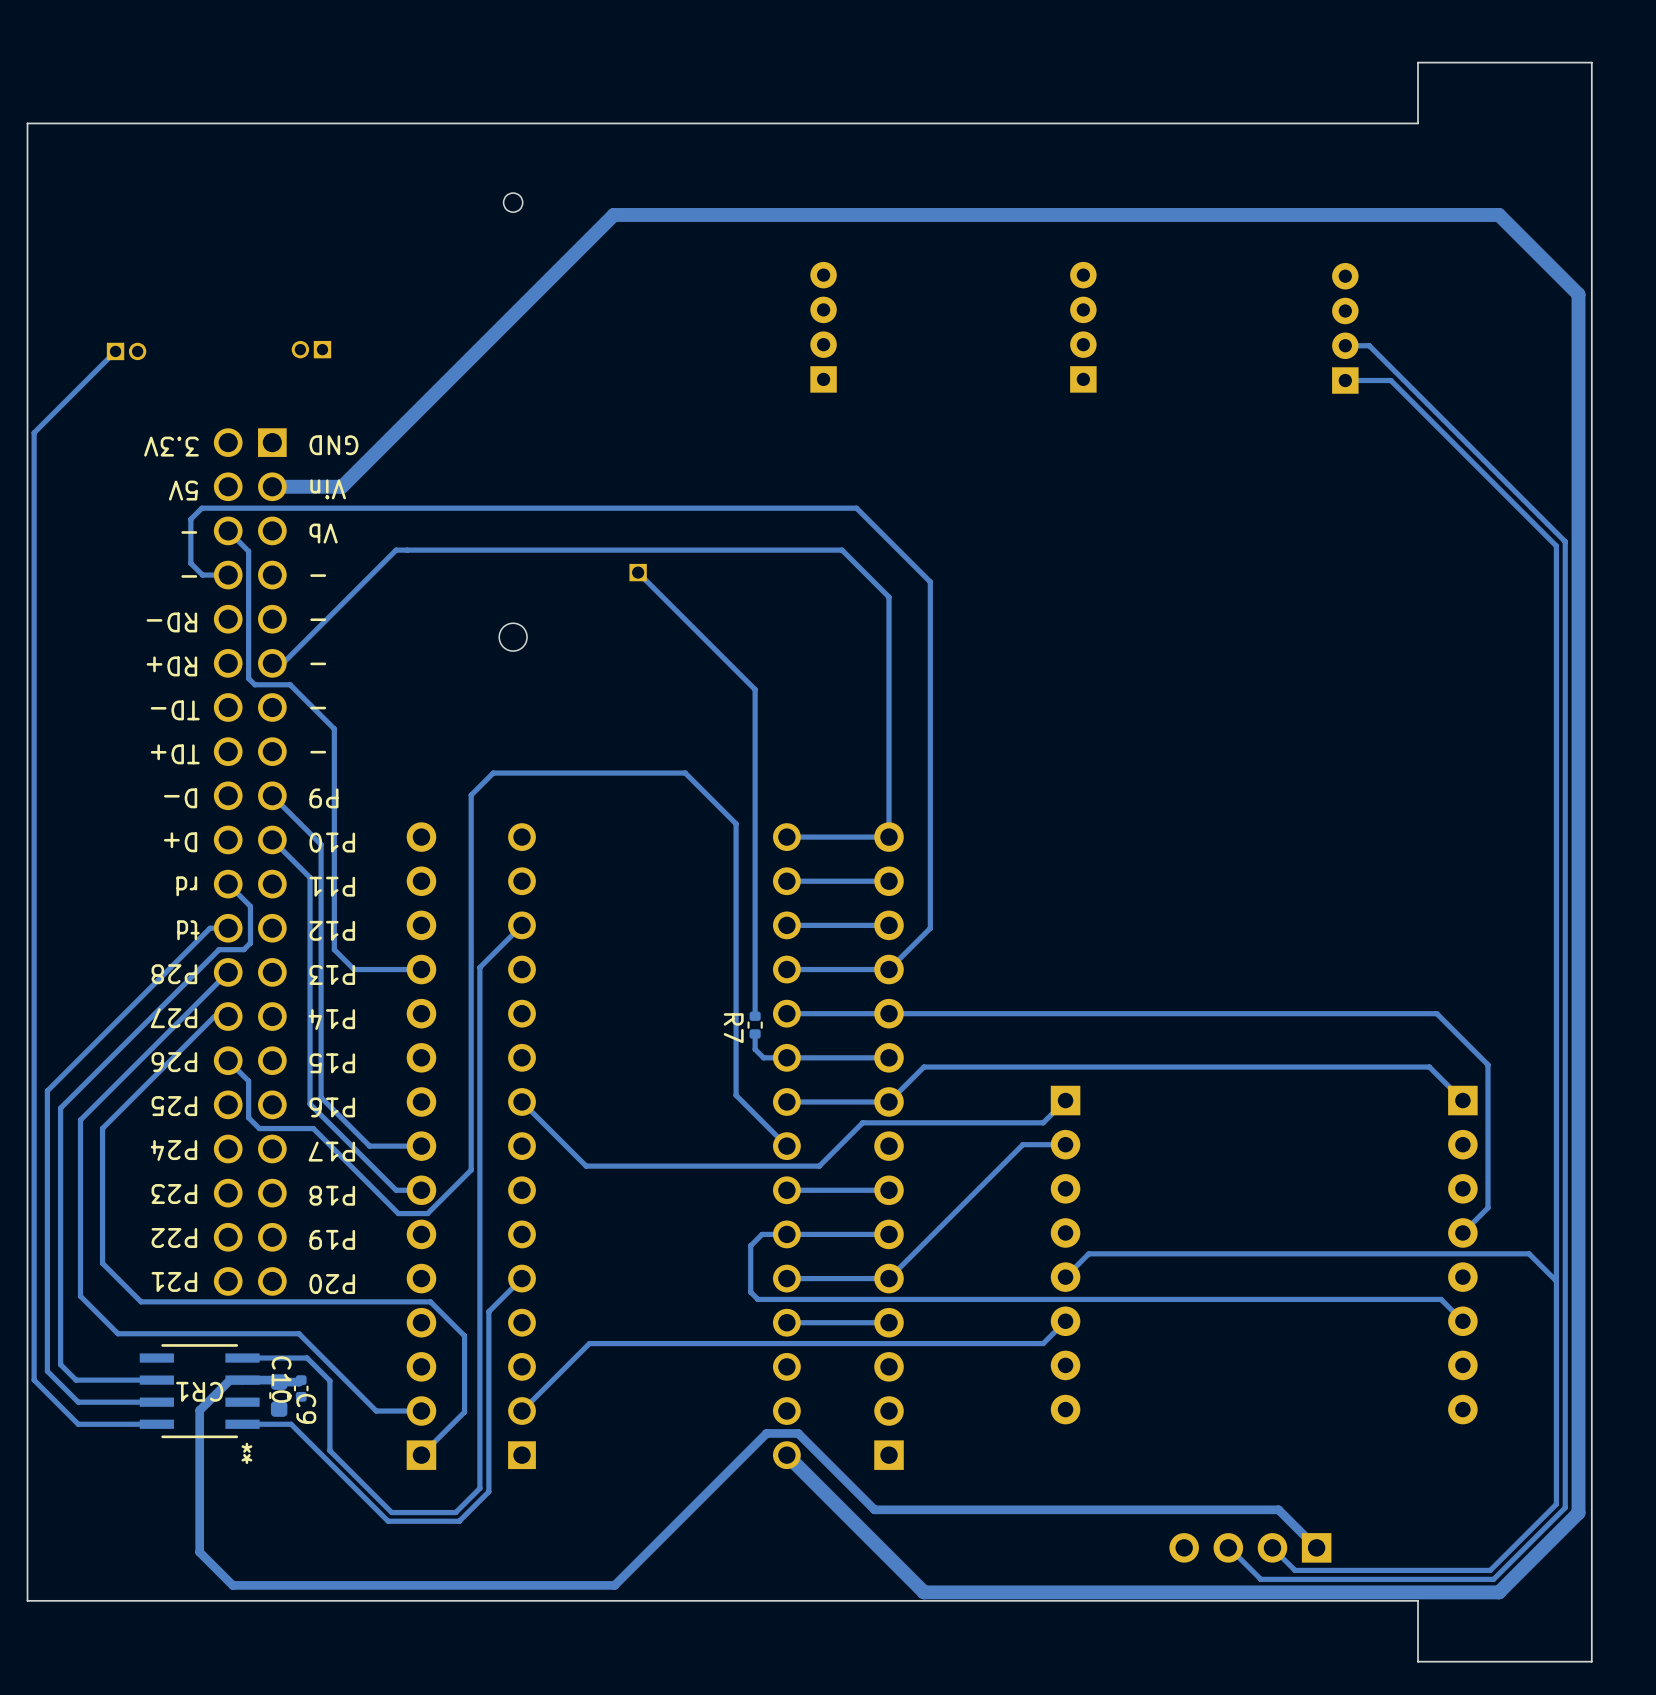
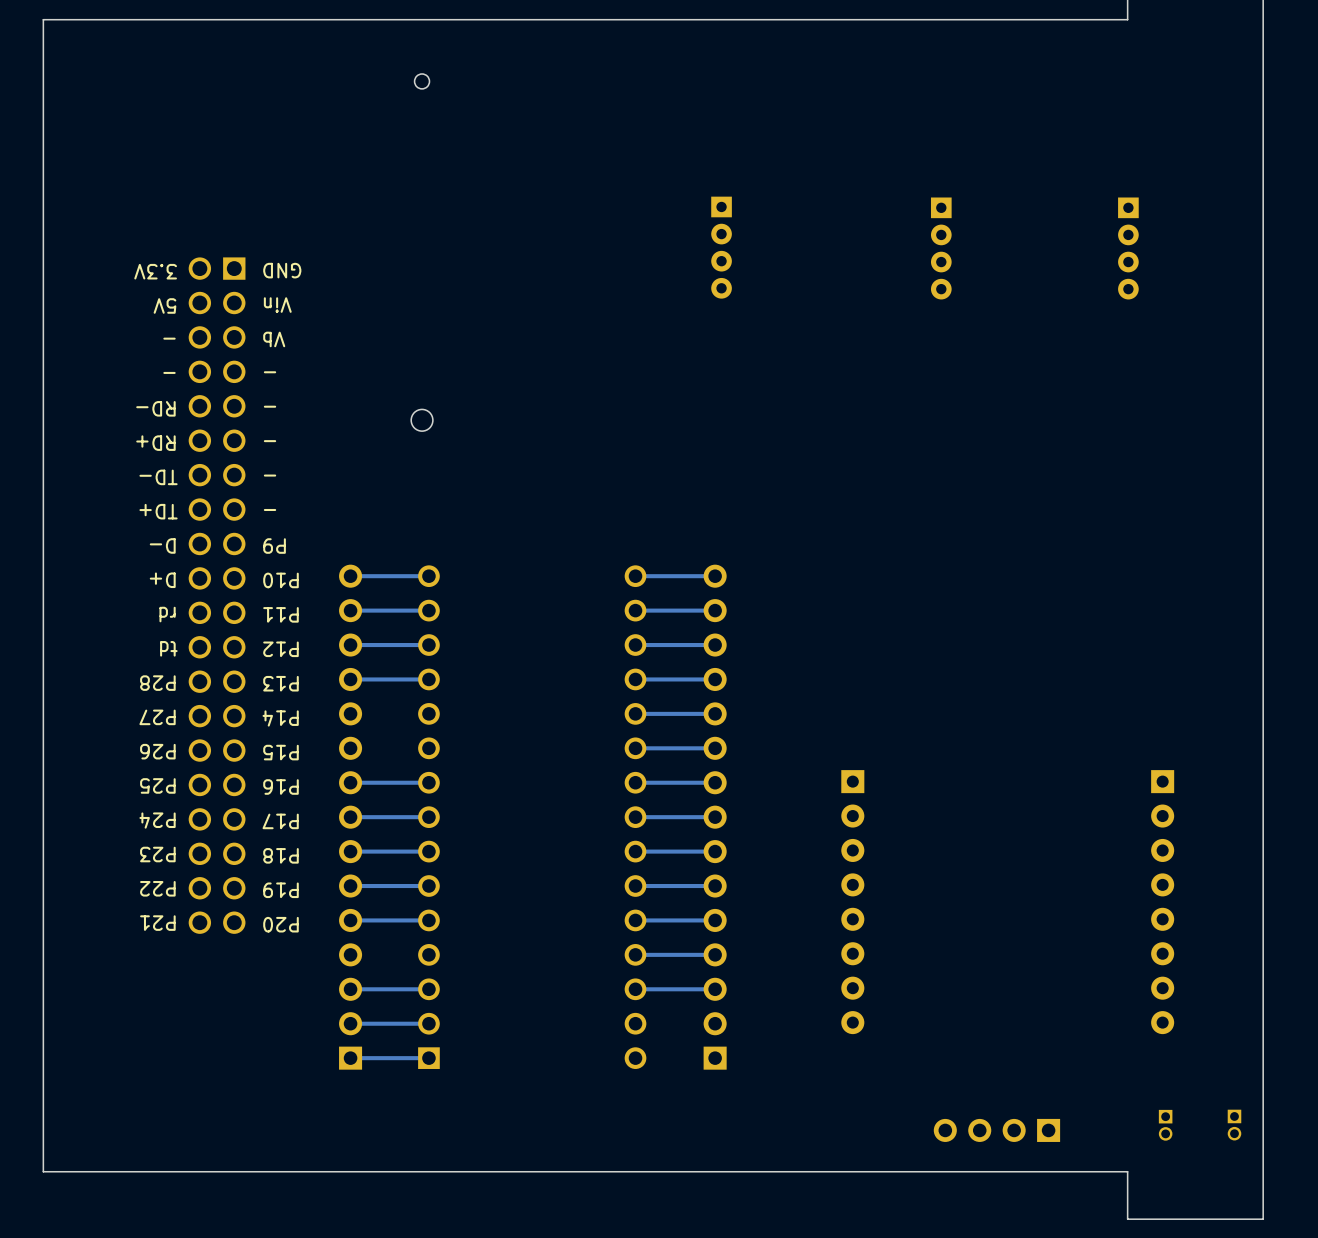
part: (823, 327) -> none
part: (1083, 327) -> none
part: (1345, 328) -> none
track: (1345, 345) (1369, 345) (1565, 541) (1565, 1507) (1493, 1579) (1260, 1579) (1228, 1547) -> none
part: (311, 349) -> none
track: (115, 351) (34, 432) (34, 1380) (78, 1424) (156, 1423) -> none
part: (126, 351) -> none
track: (1345, 380) (1390, 380) (1556, 546) (1556, 1504) (1490, 1570) (1295, 1570) (1272, 1547) -> none
part: none -> (721, 247)
part: none -> (941, 248)
part: none -> (1128, 248)
track: (272, 486) (342, 486) (613, 214) (1499, 214) (1578, 294) (1578, 1512) (1499, 1592) (924, 1592) (786, 1455) -> none
track: (228, 530) (248, 551) (248, 678) (254, 684) (290, 684) (334, 728) (334, 949) (354, 969) (421, 969) -> (428, 679) (350, 679)
track: (638, 572) (755, 689) (755, 1016) -> none
part: (638, 572) -> none
track: (228, 575) (202, 575) (190, 563) (190, 519) (201, 508) (856, 508) (930, 581) (930, 928) (889, 969) -> none
track: (272, 663) (282, 663) (396, 550) (842, 550) (889, 597) (889, 837) -> none
track: (272, 795) (321, 844) (321, 1097) (369, 1146) (421, 1146) -> (428, 817) (350, 817)
track: none -> (428, 576) (350, 576)
track: (272, 839) (310, 877) (310, 1104) (396, 1190) (421, 1190) -> (428, 851) (350, 851)
track: none -> (428, 610) (350, 610)
track: (228, 884) (250, 906) (250, 943) (243, 949) (219, 949) (60, 1108) (60, 1364) (76, 1380) (156, 1380) -> none
track: (522, 925) (479, 967) (479, 1488) (455, 1512) (391, 1512) (329, 1450) (329, 1380) (307, 1358) (242, 1358) -> (428, 645) (350, 645)
track: (228, 928) (210, 928) (47, 1090) (47, 1371) (78, 1402) (156, 1402) -> none
track: (228, 972) (80, 1120) (80, 1296) (118, 1333) (299, 1333) (376, 1411) (421, 1411) -> (428, 1023) (350, 1023)
track: (889, 1013) (1436, 1013) (1488, 1064) (1488, 1207) (1462, 1232) -> none
track: (228, 1016) (214, 1016) (102, 1128) (102, 1263) (141, 1301) (430, 1301) (464, 1335) (464, 1412) (421, 1455) -> (428, 1058) (350, 1058)
R7: (755, 1025) -> none
track: (755, 1033) (755, 1049) (763, 1057) (786, 1057) -> none
track: (228, 1060) (248, 1081) (248, 1117) (259, 1128) (313, 1128) (398, 1213) (427, 1213) (471, 1170) (471, 795) (493, 773) (685, 773) (736, 823) (736, 1095) (786, 1146) -> (715, 817) (635, 817)
track: (1065, 1100) (1043, 1122) (862, 1122) (819, 1166) (586, 1166) (522, 1101) -> (350, 782) (428, 782)
track: (1462, 1100) (1429, 1067) (923, 1067) (889, 1101) -> none
track: (1065, 1144) (1022, 1144) (889, 1278) -> none
track: none -> (428, 886) (350, 886)
track: (786, 1234) (762, 1234) (750, 1245) (750, 1292) (757, 1299) (1441, 1299) (1462, 1321) -> none
track: (1065, 1277) (1088, 1253) (1529, 1253) (1556, 1281) -> none
track: (521, 1278) (488, 1311) (488, 1491) (459, 1521) (388, 1521) (291, 1424) (242, 1424) -> (428, 920) (350, 920)
track: (1065, 1321) (1043, 1343) (589, 1343) (522, 1411) -> none
track: none -> (428, 989) (350, 989)
track: none -> (715, 989) (635, 989)
track: (301, 1380) (299, 1382) (230, 1380) (199, 1410) (199, 1552) (232, 1585) (614, 1585) (766, 1433) (798, 1433) (874, 1509) (1278, 1509) (1316, 1547) -> none
C10: (301, 1388) -> none
CR1: (199, 1391) -> none
C9: (279, 1395) -> none
part: none -> (1234, 1125)
part: none -> (1165, 1125)

